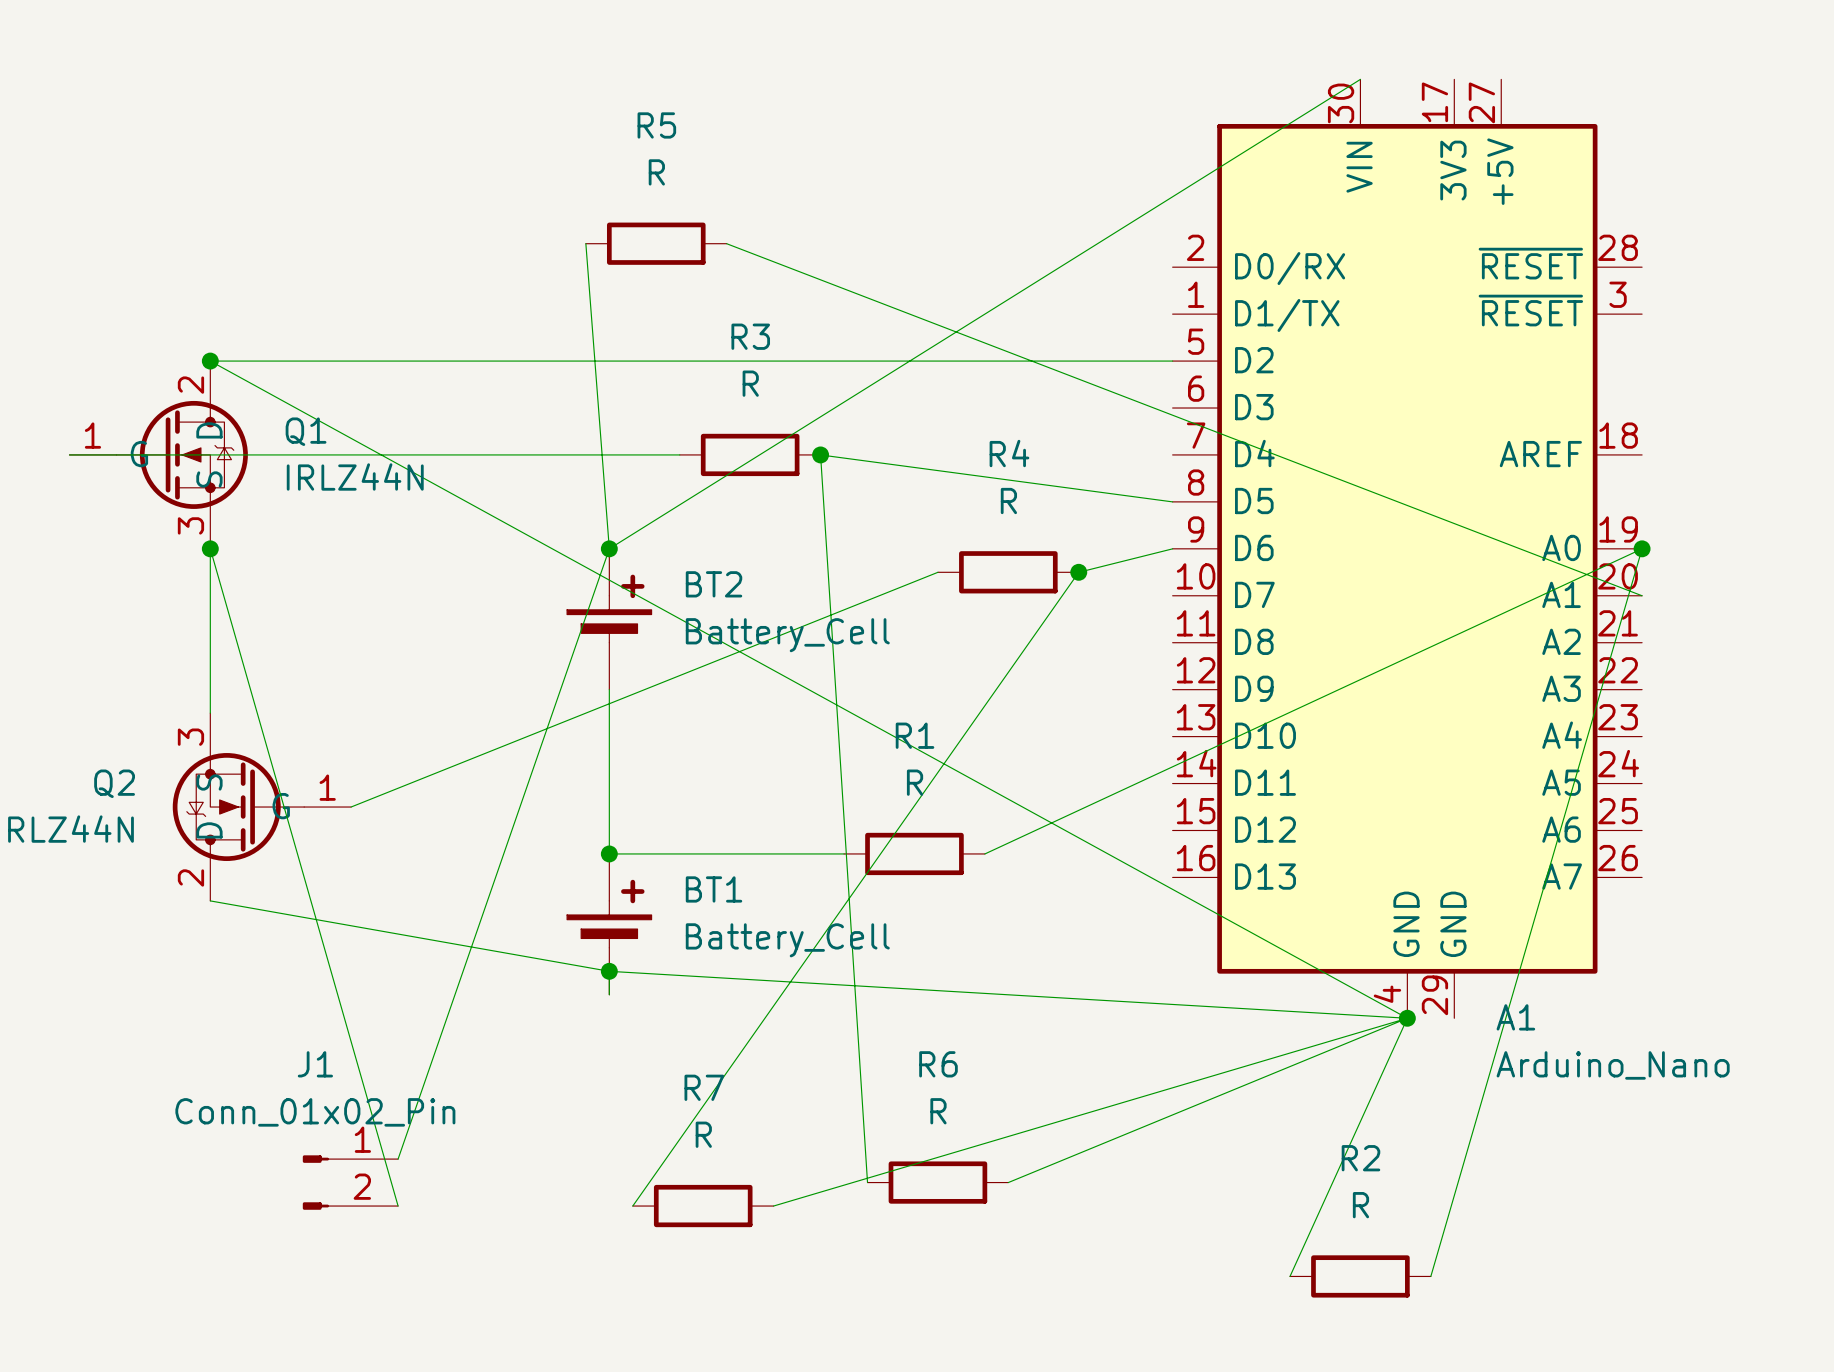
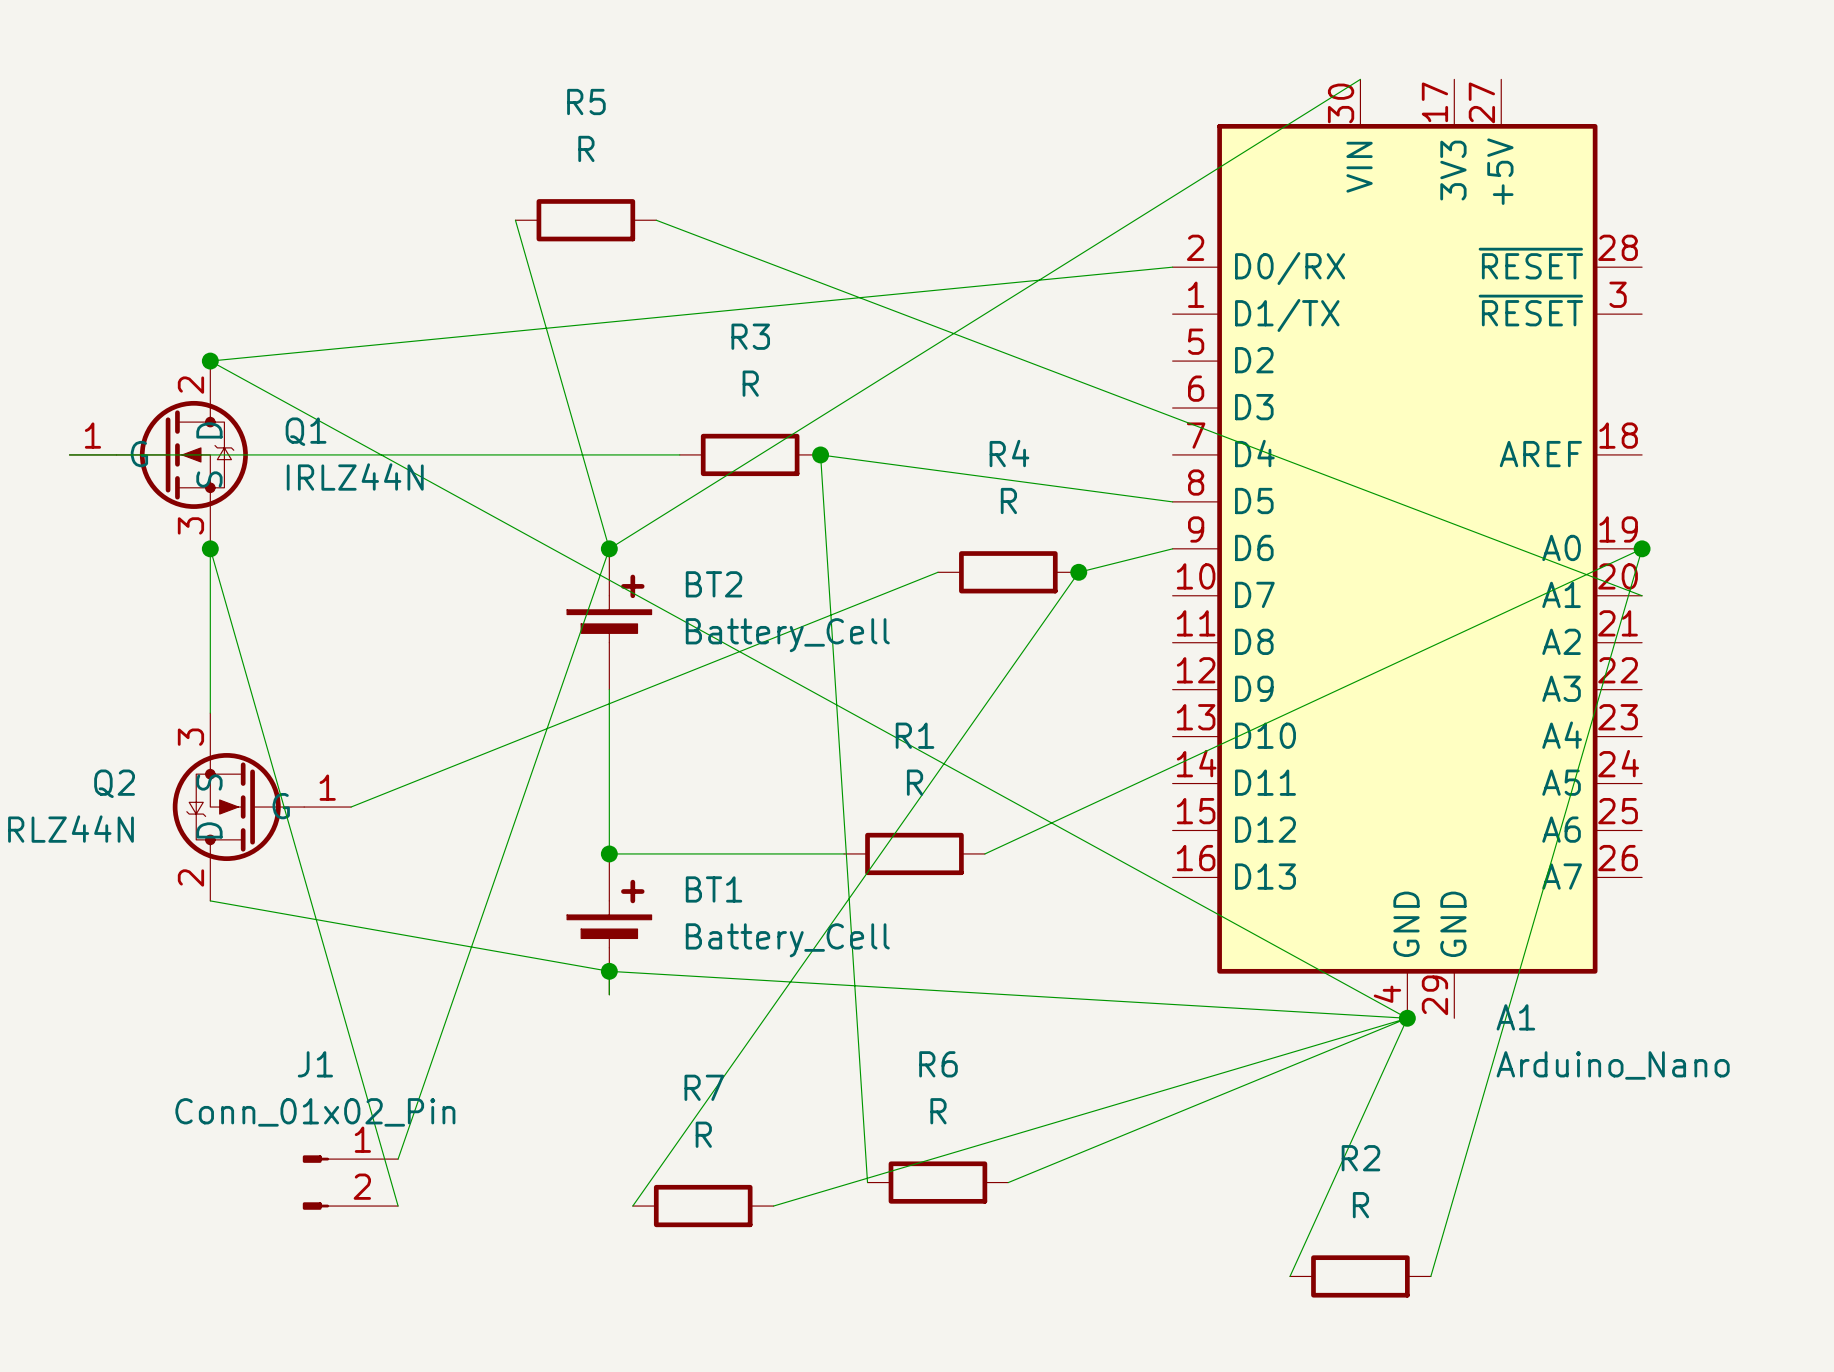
wire: (585, 243) (609, 548) -> (515, 220) (609, 548)
R5 position: (656, 243) -> (585, 220)
wire: (726, 243) (1642, 595) -> (656, 220) (1642, 595)
wire: (210, 361) (1172, 361) -> (210, 361) (1172, 267)

